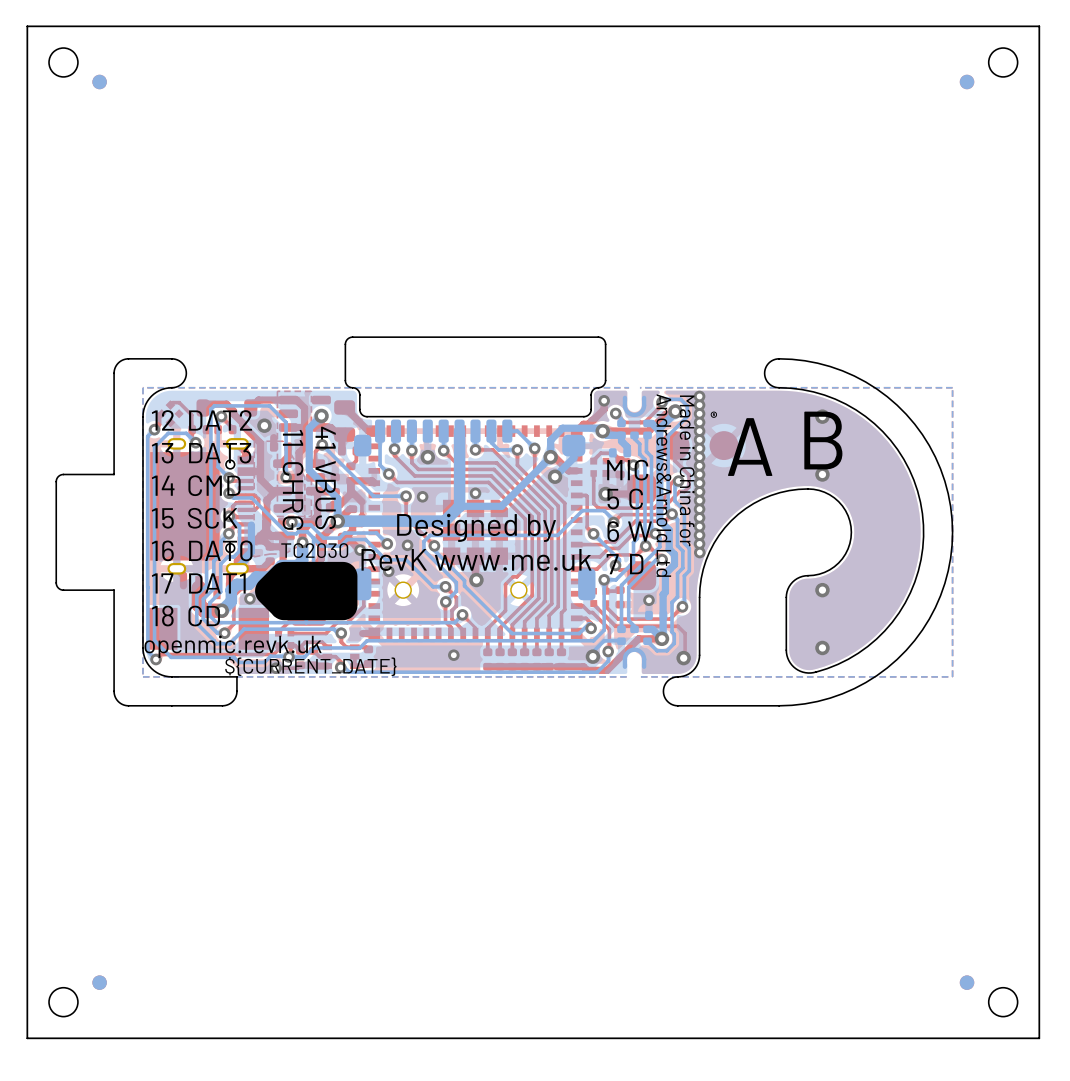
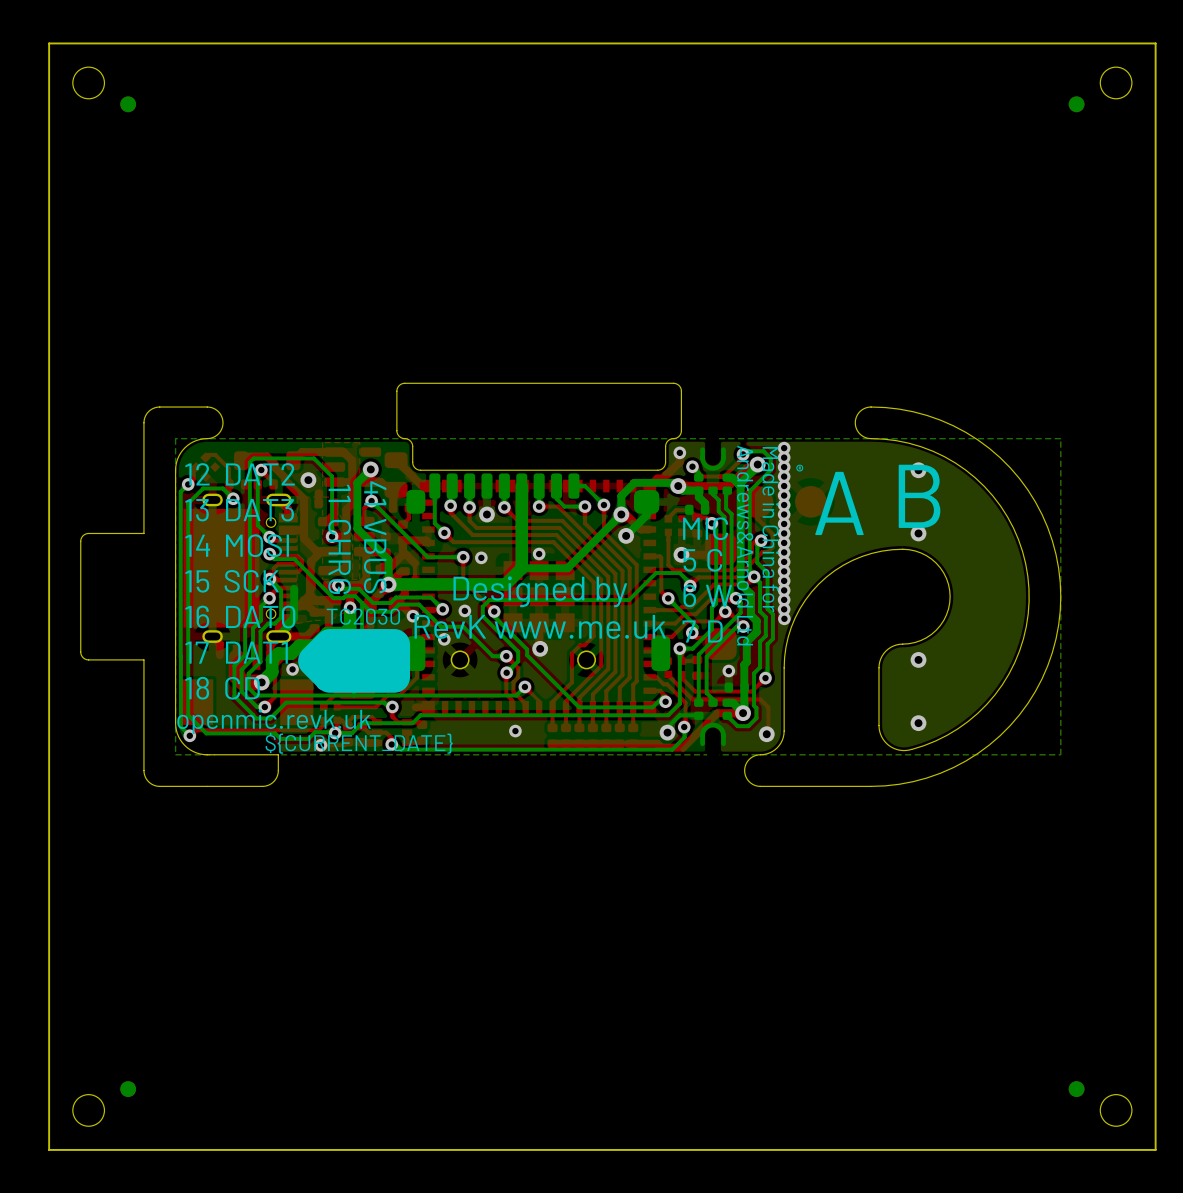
text: CMD (214, 485) -> MOSI (257, 545)

